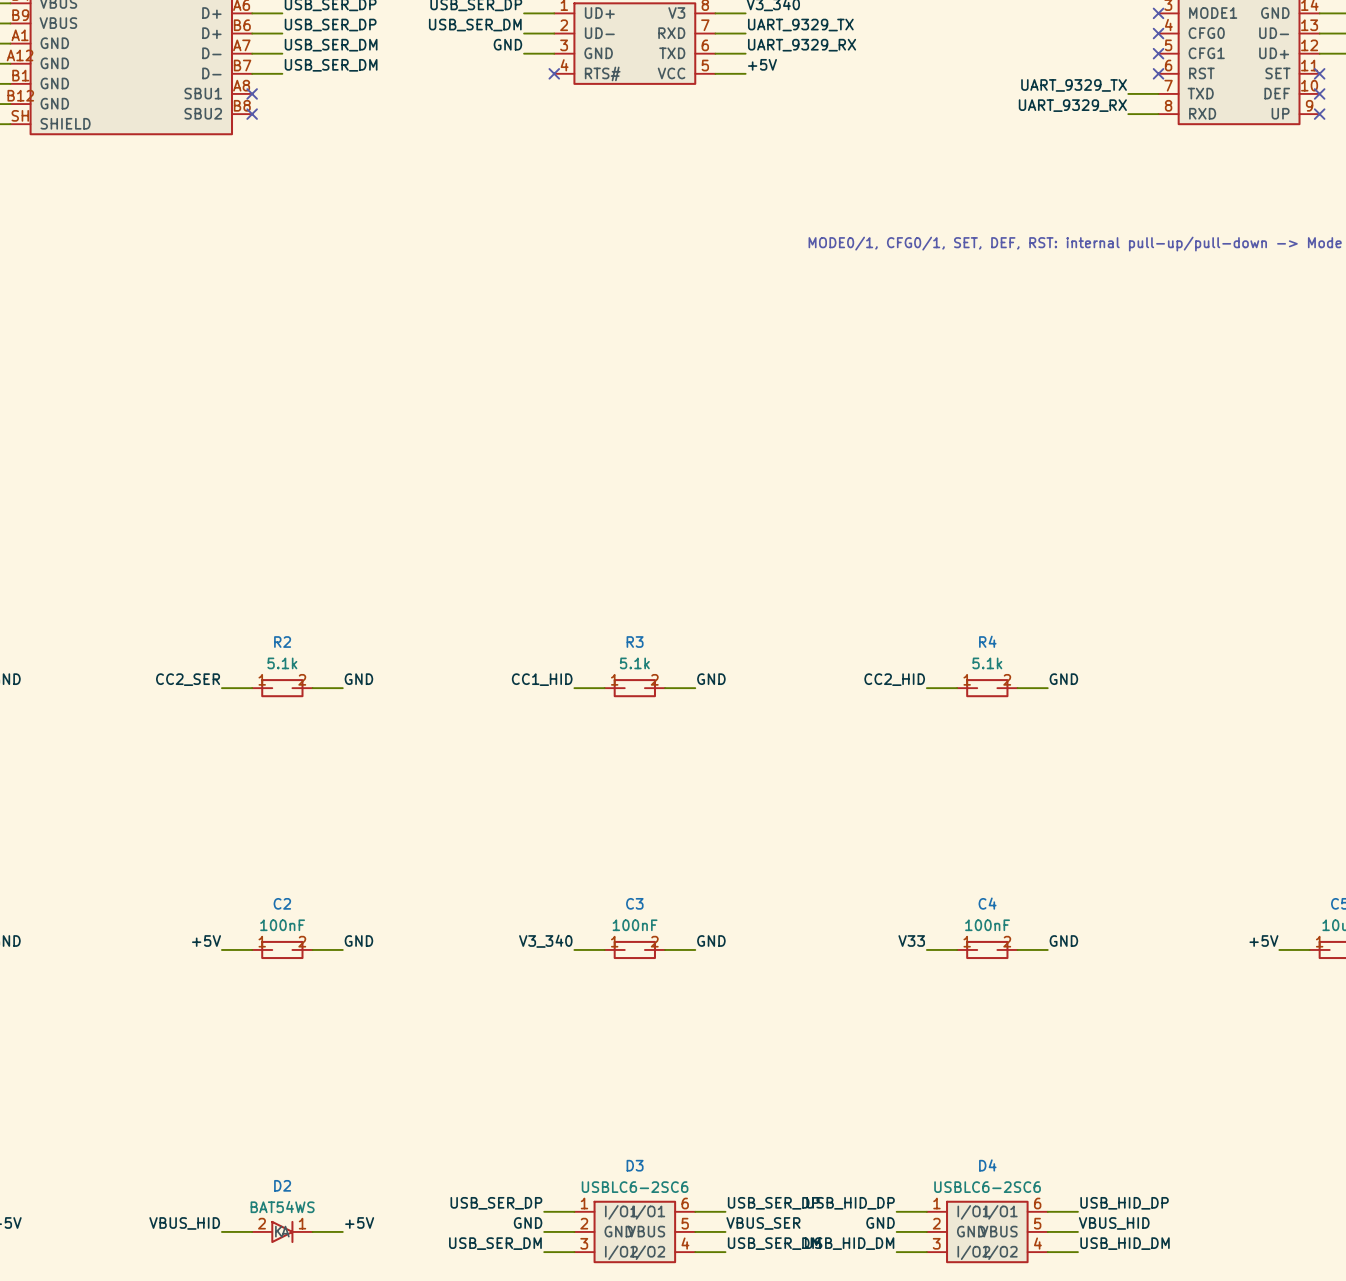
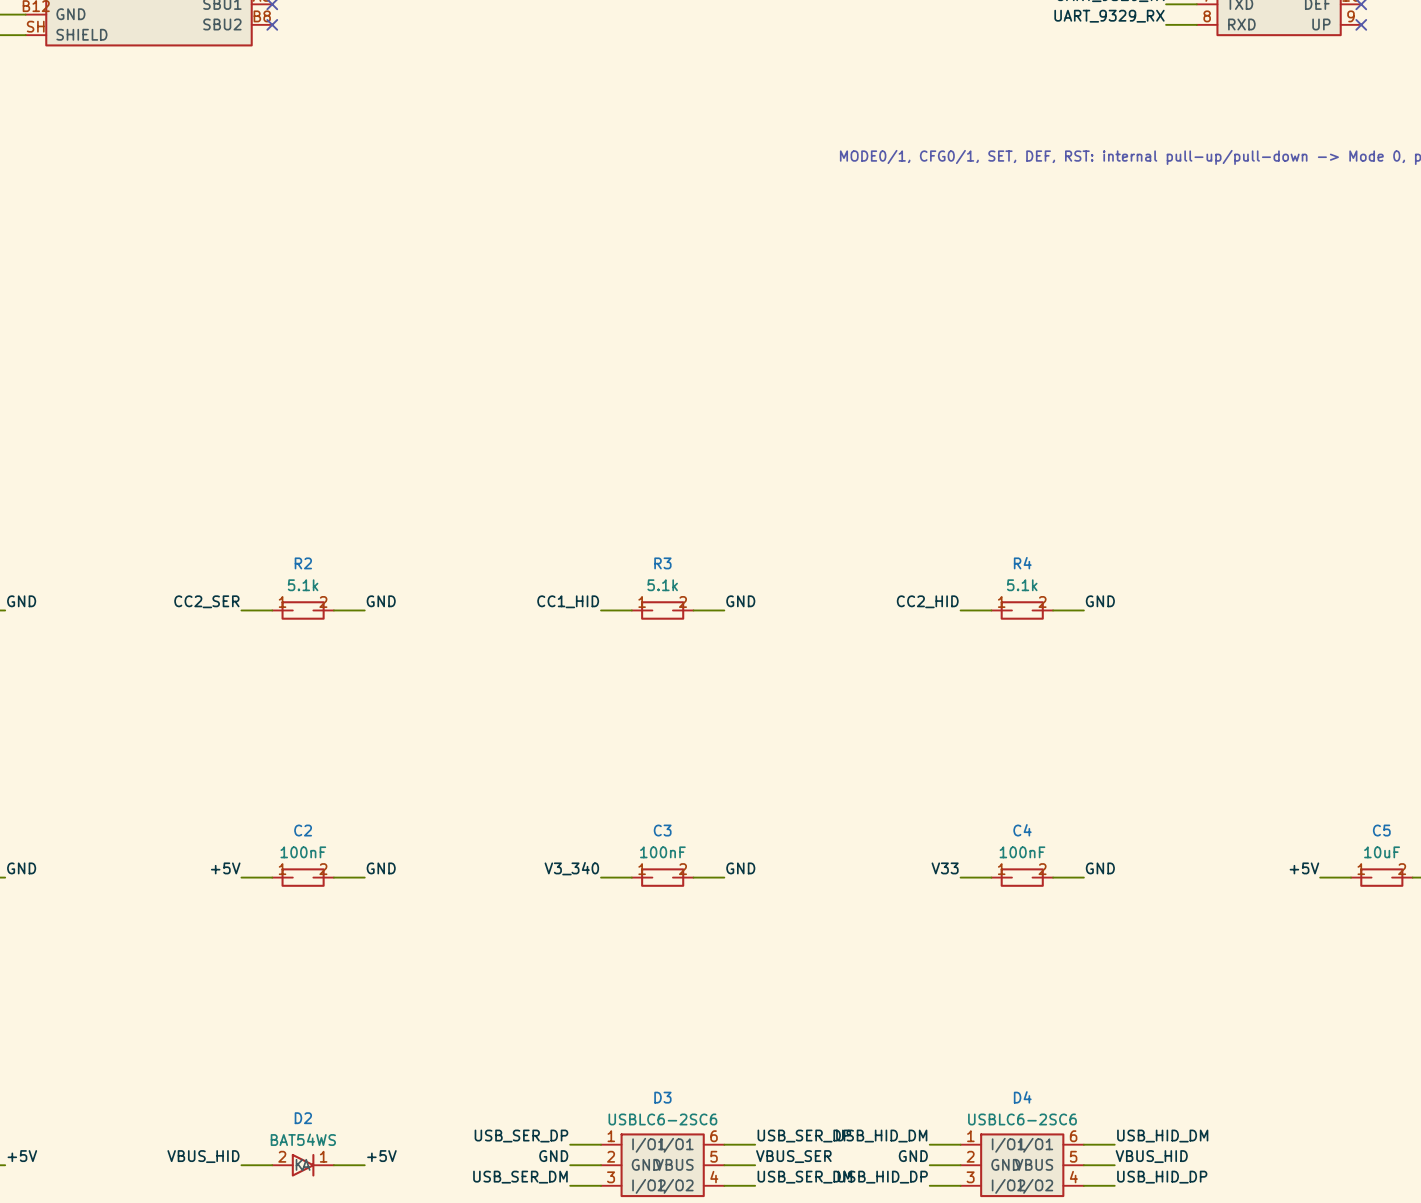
label: USB_HID_DP (850, 1203) -> USB_HID_DM (881, 1136)
label: USB_HID_DP (1124, 1203) -> USB_HID_DM (1162, 1136)
label: USB_HID_DM (849, 1243) -> USB_HID_DP (882, 1177)
label: USB_HID_DM (1125, 1243) -> USB_HID_DP (1162, 1177)

